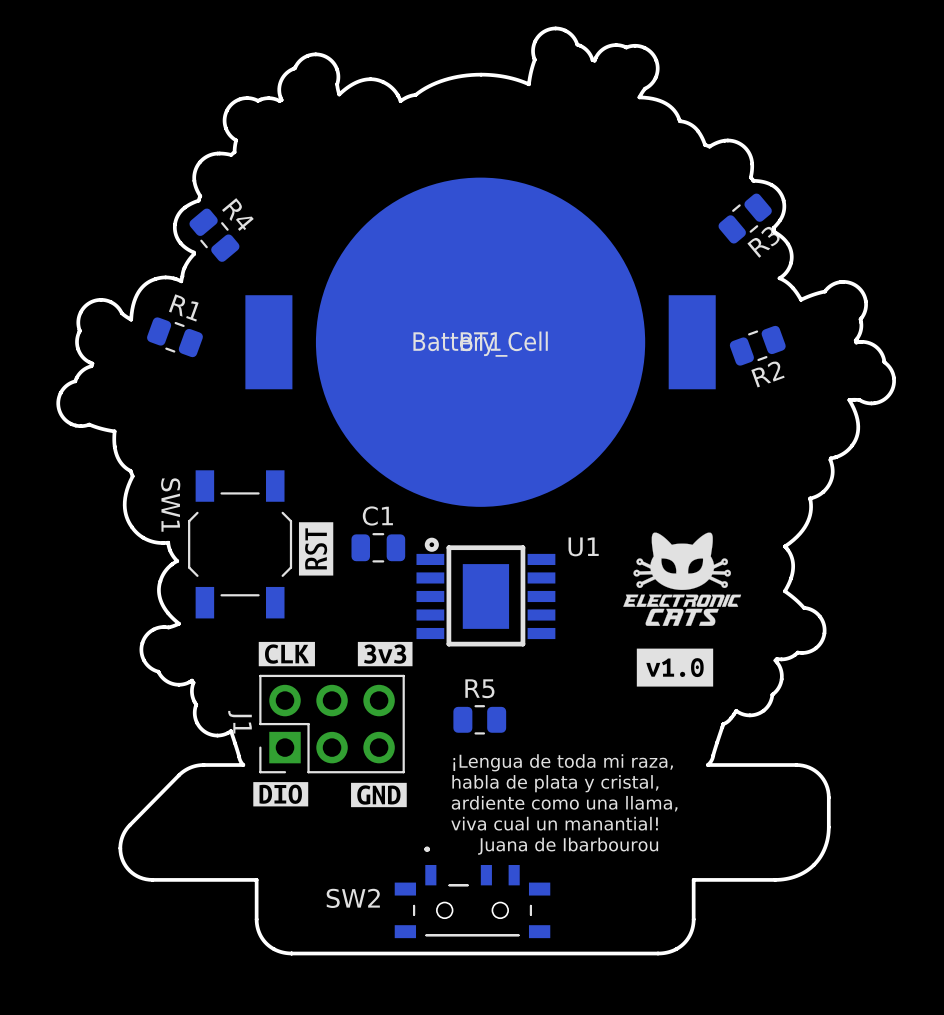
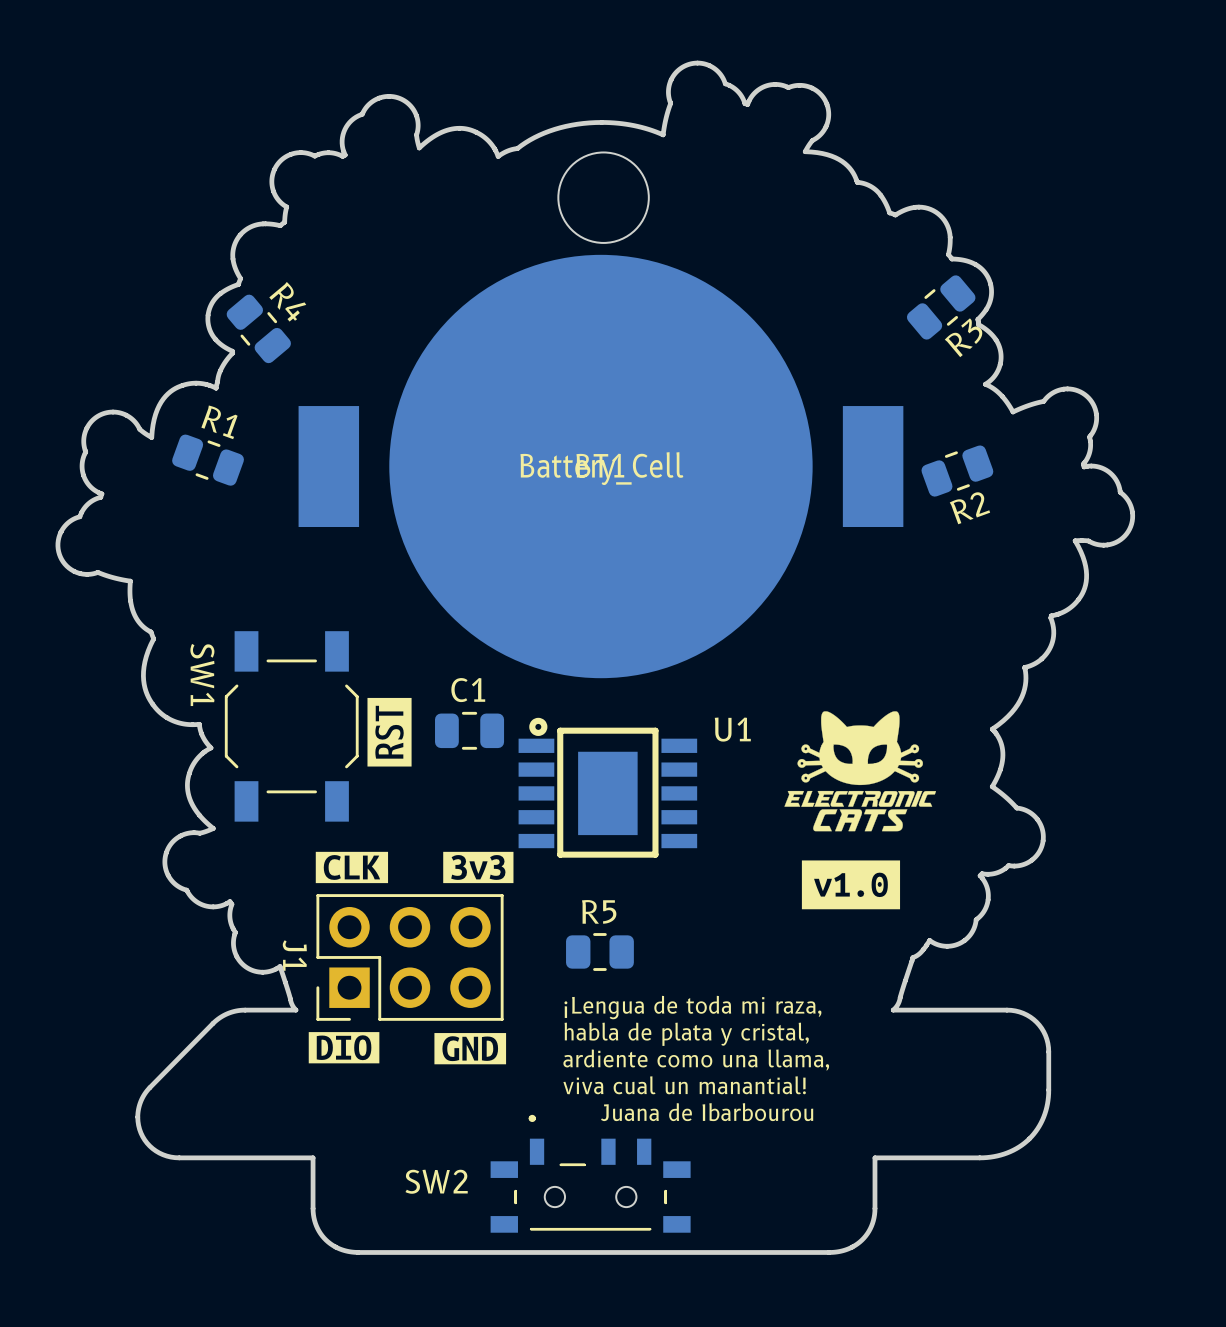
round board edge: none -> [557, 151, 650, 244]

